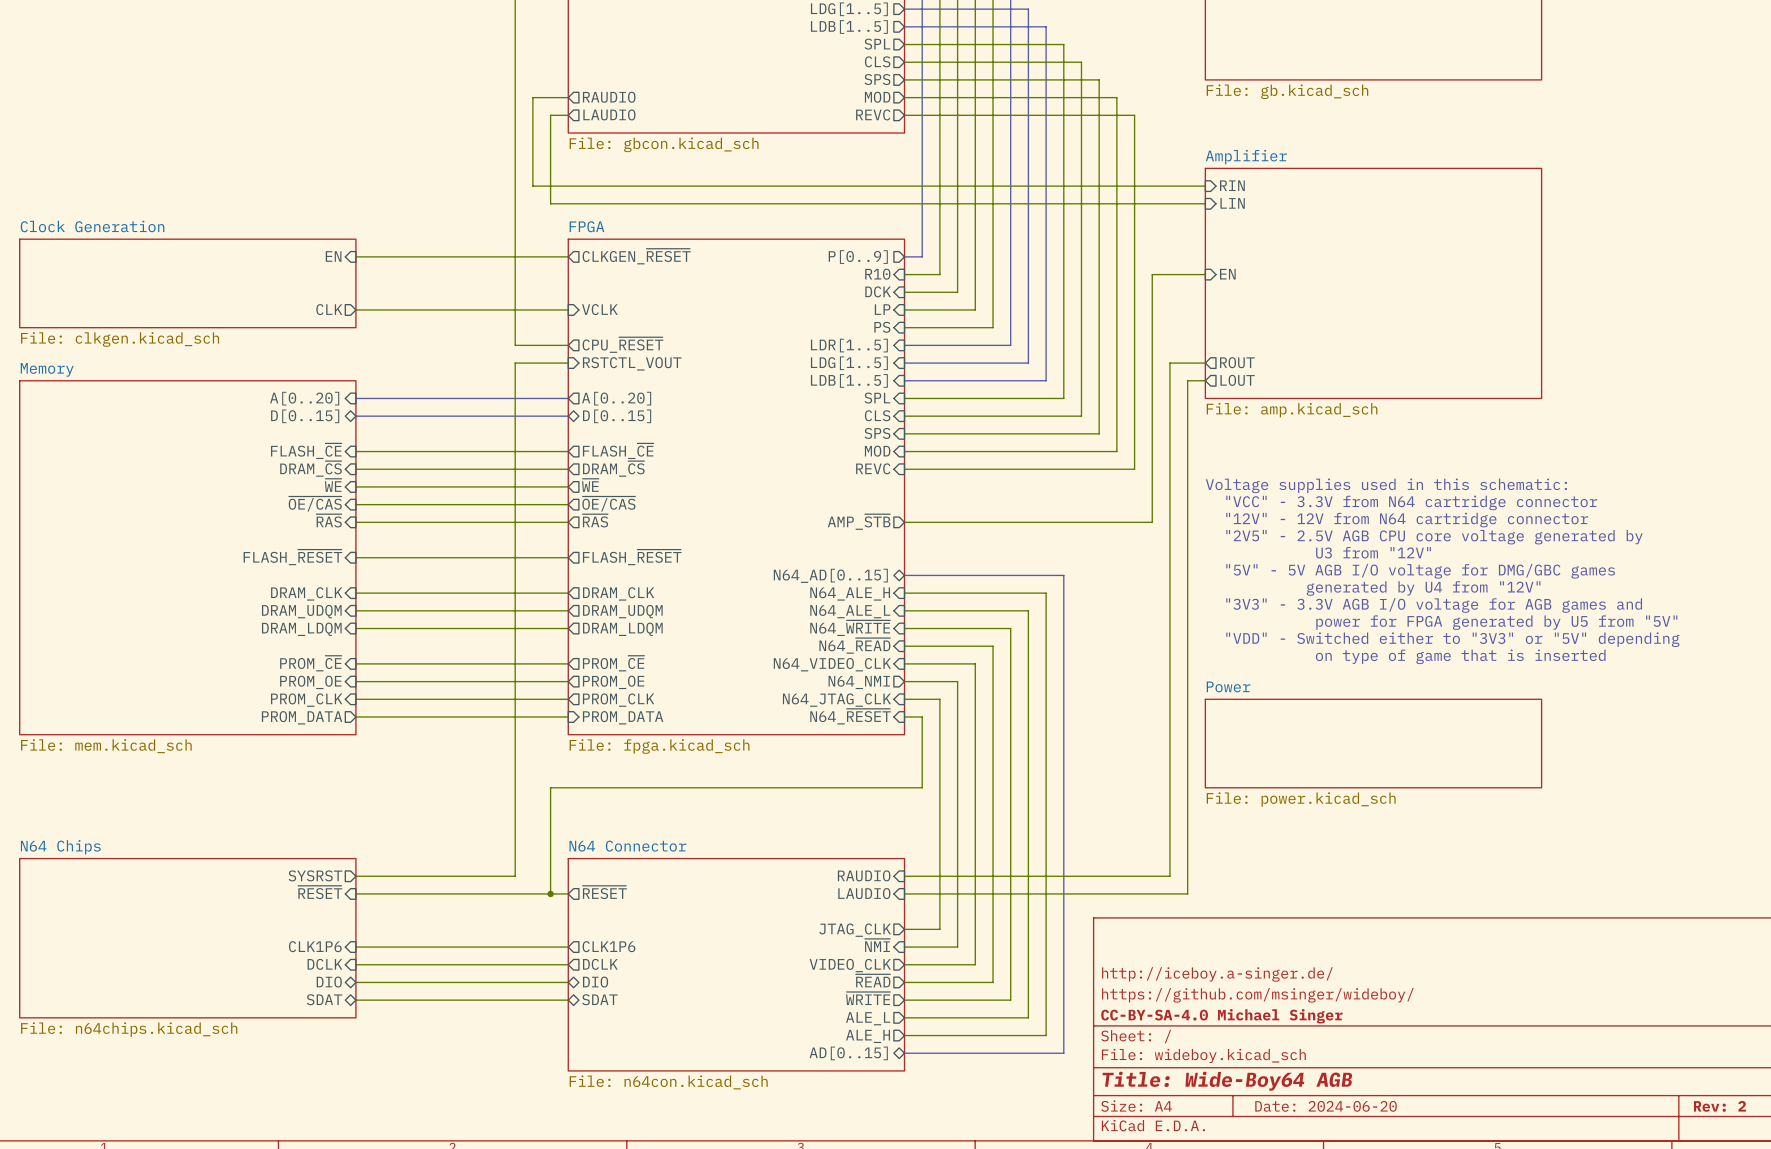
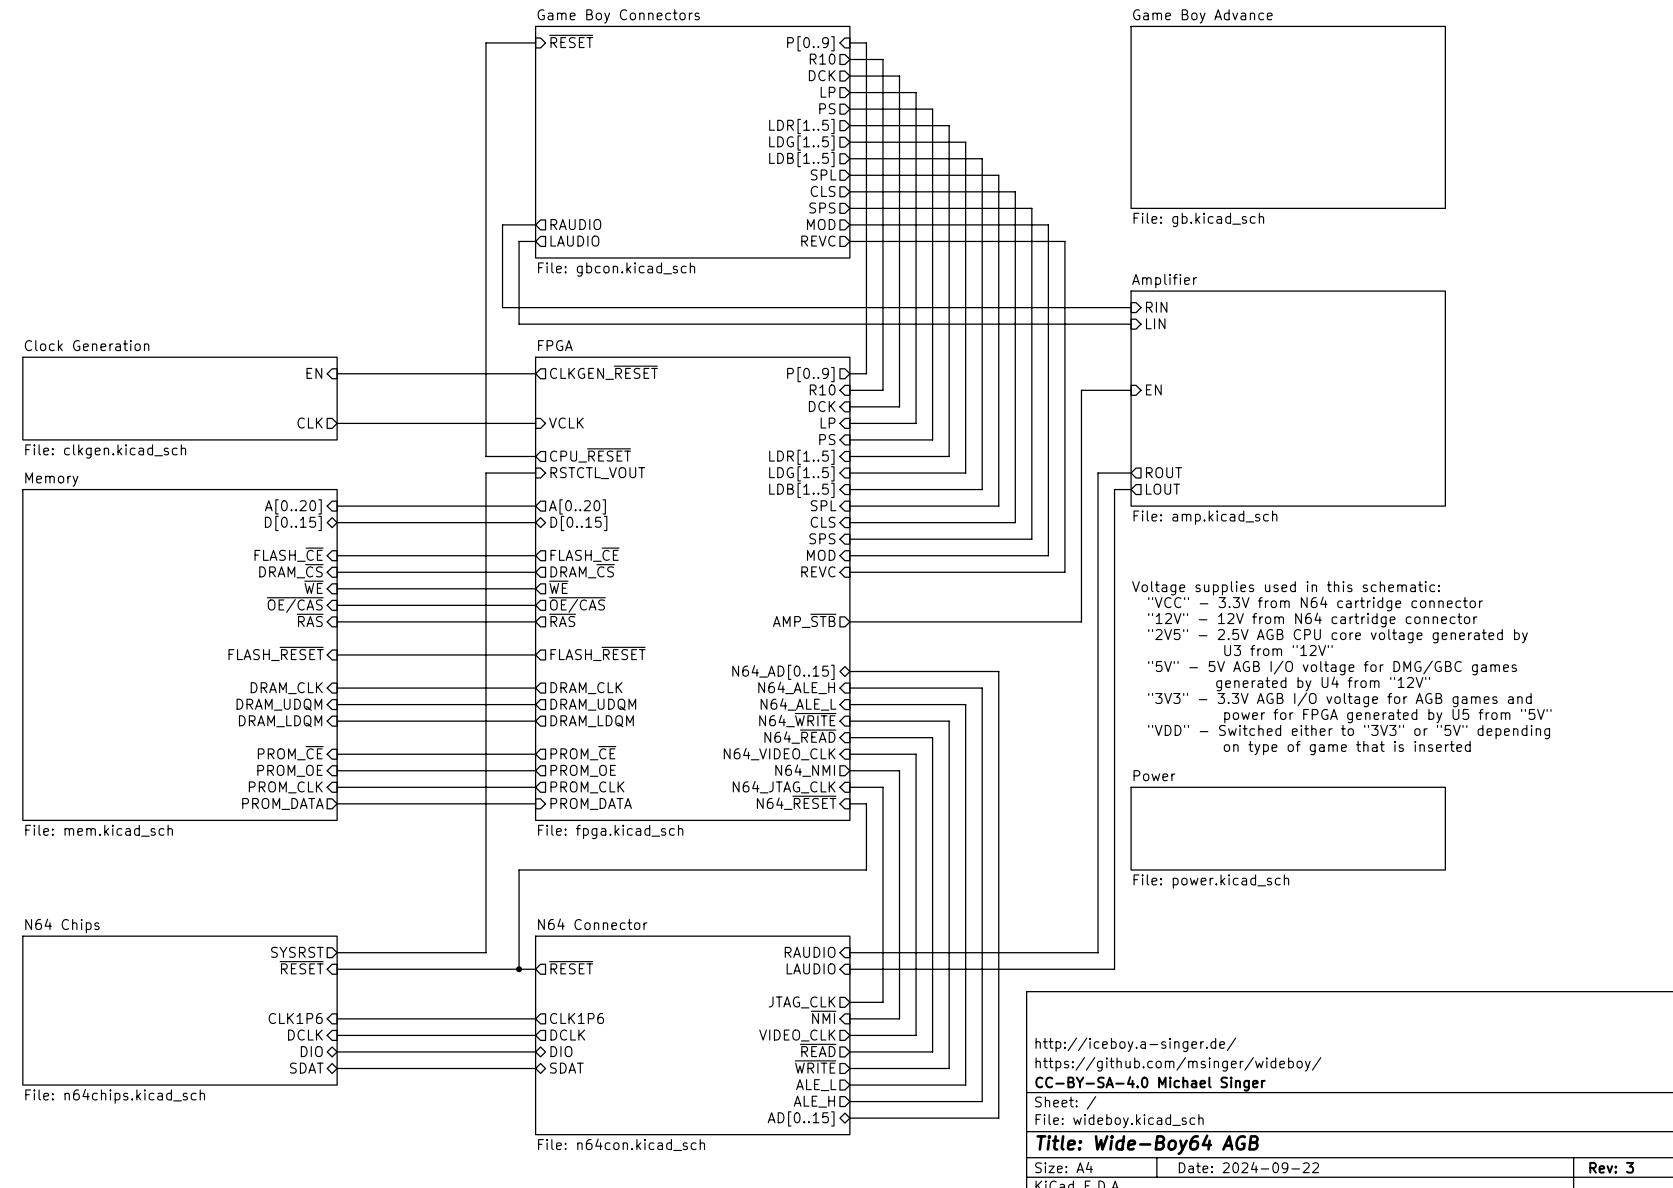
title block: Date: 2024-06-20 (1326, 1106) -> Date: 2024-09-22 (1248, 1167)
title block: Rev: 2 (1719, 1106) -> Rev: 3 (1611, 1167)

